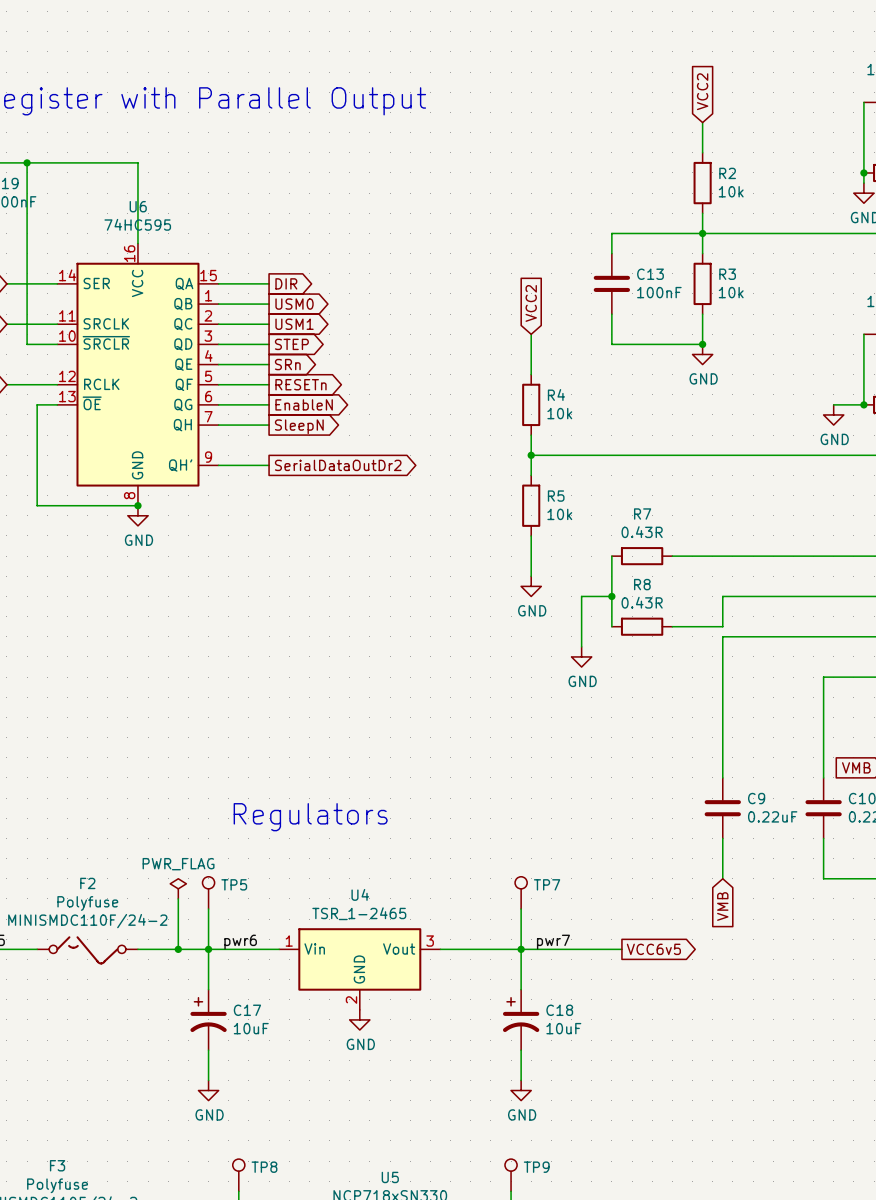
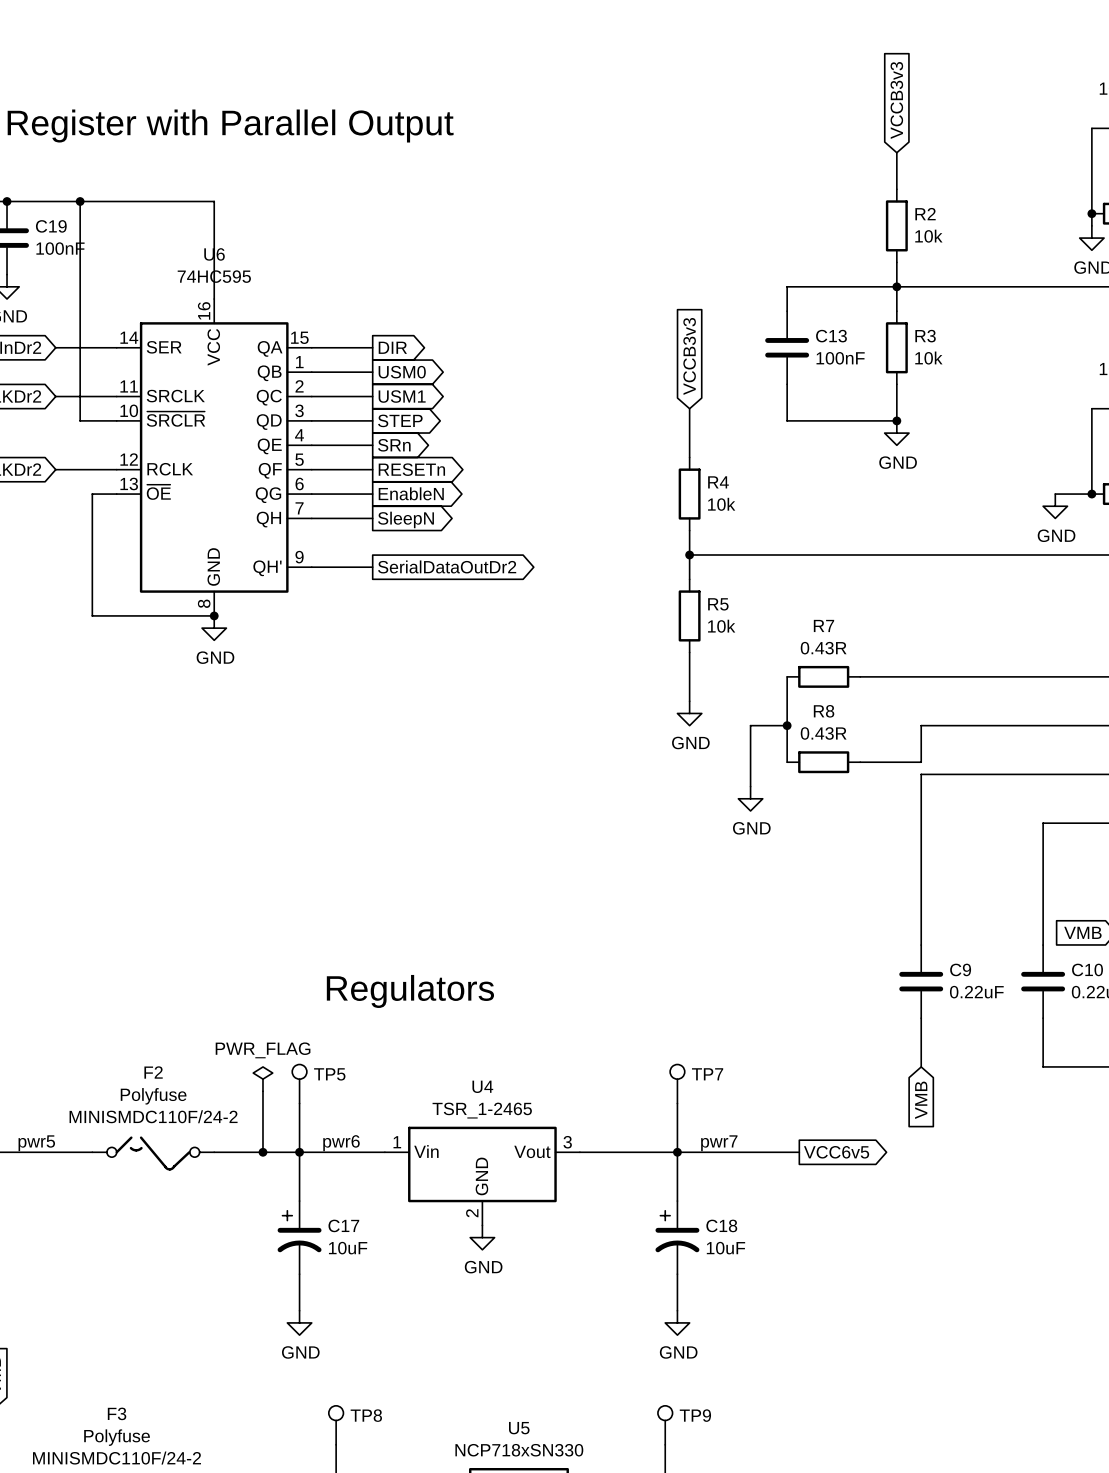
global label: VCC2 (702, 91) -> VCCB3v3 (896, 100)
global label: VCC2 (531, 303) -> VCCB3v3 (689, 356)

